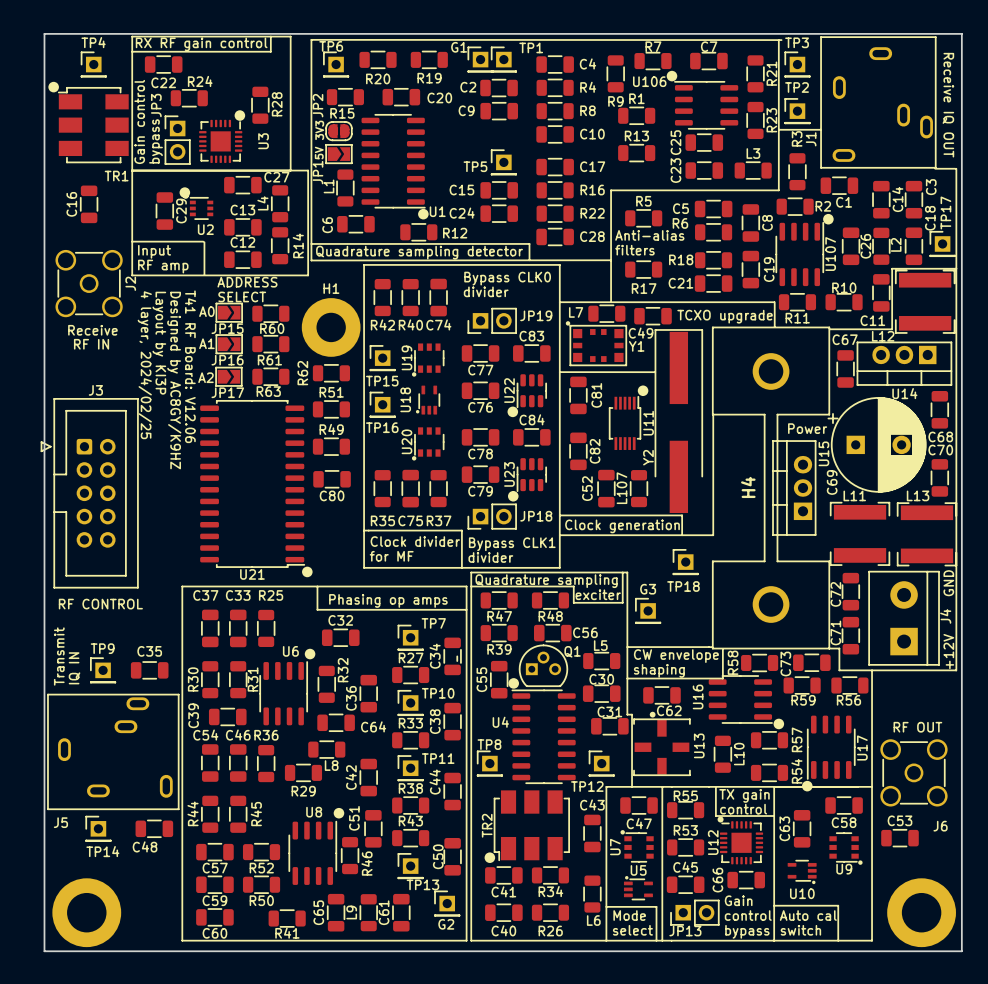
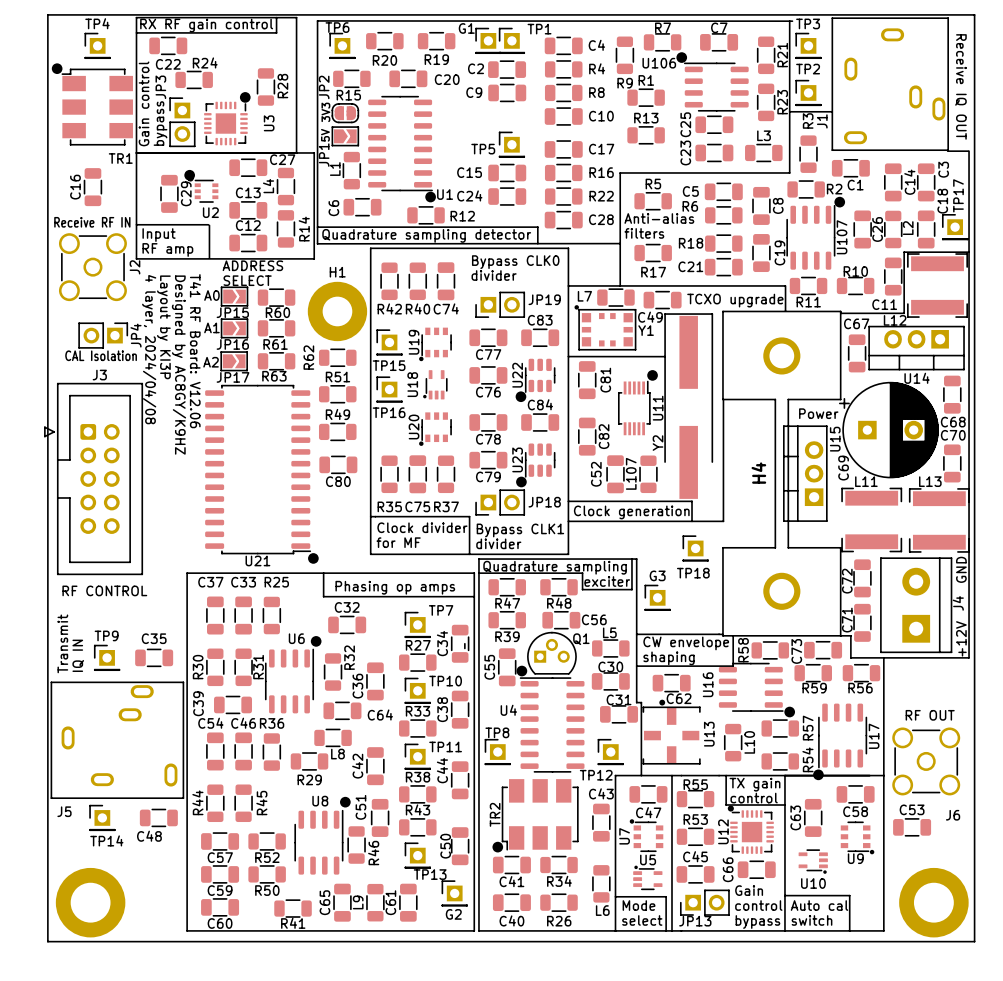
text: none -> Receive RF IN (92, 222)
text: Receive (92, 330) -> none
text: RF IN (91, 344) -> none
JP4: none -> (103, 335)
text: 4 layer, 2024/02/25 (144, 365) -> 4 layer, 2024/04/08 (149, 349)
text: none -> CAL Isolation (101, 355)

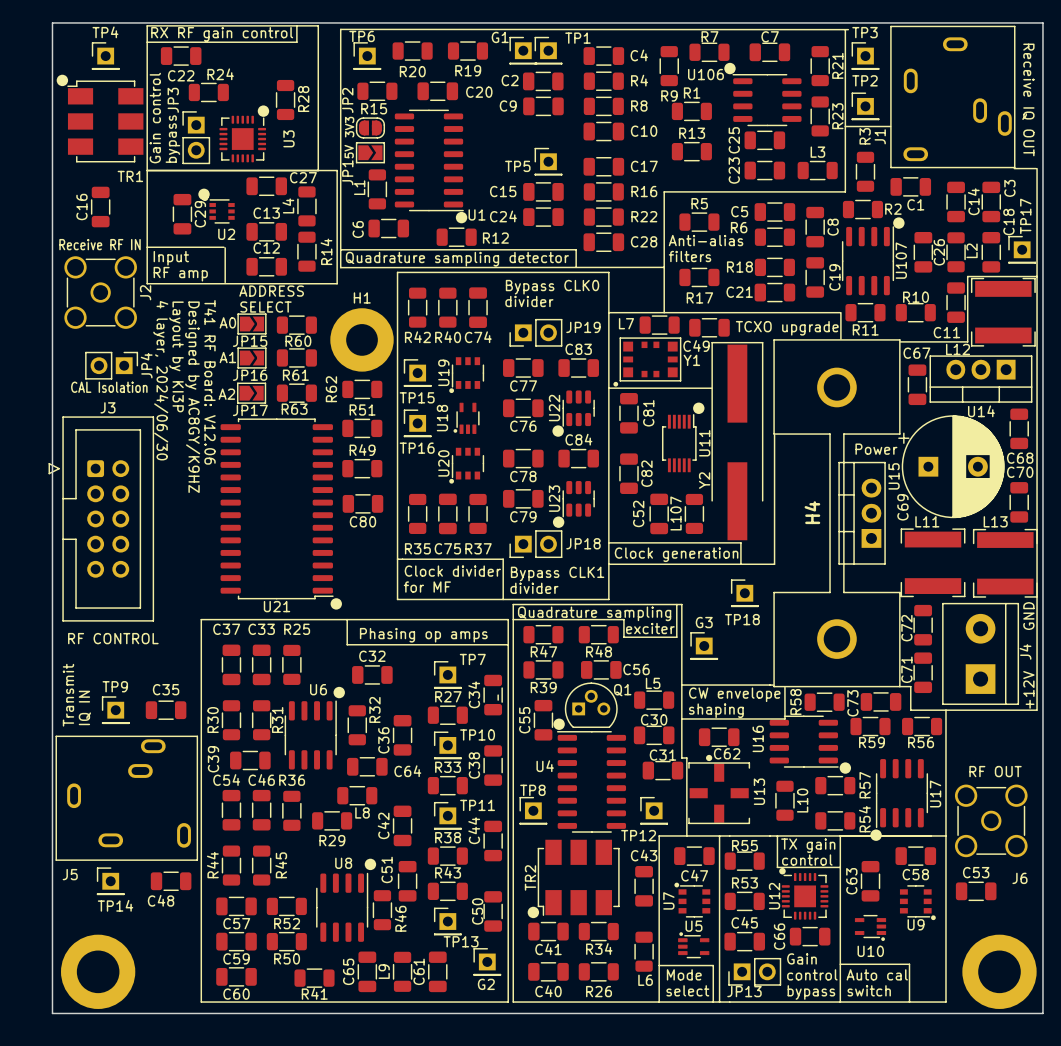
Y1 footprint: [574, 305, 637, 351] -> [613, 337, 682, 387]
text: 4 layer, 2024/04/08 (149, 349) -> 4 layer, 2024/06/30 (160, 380)

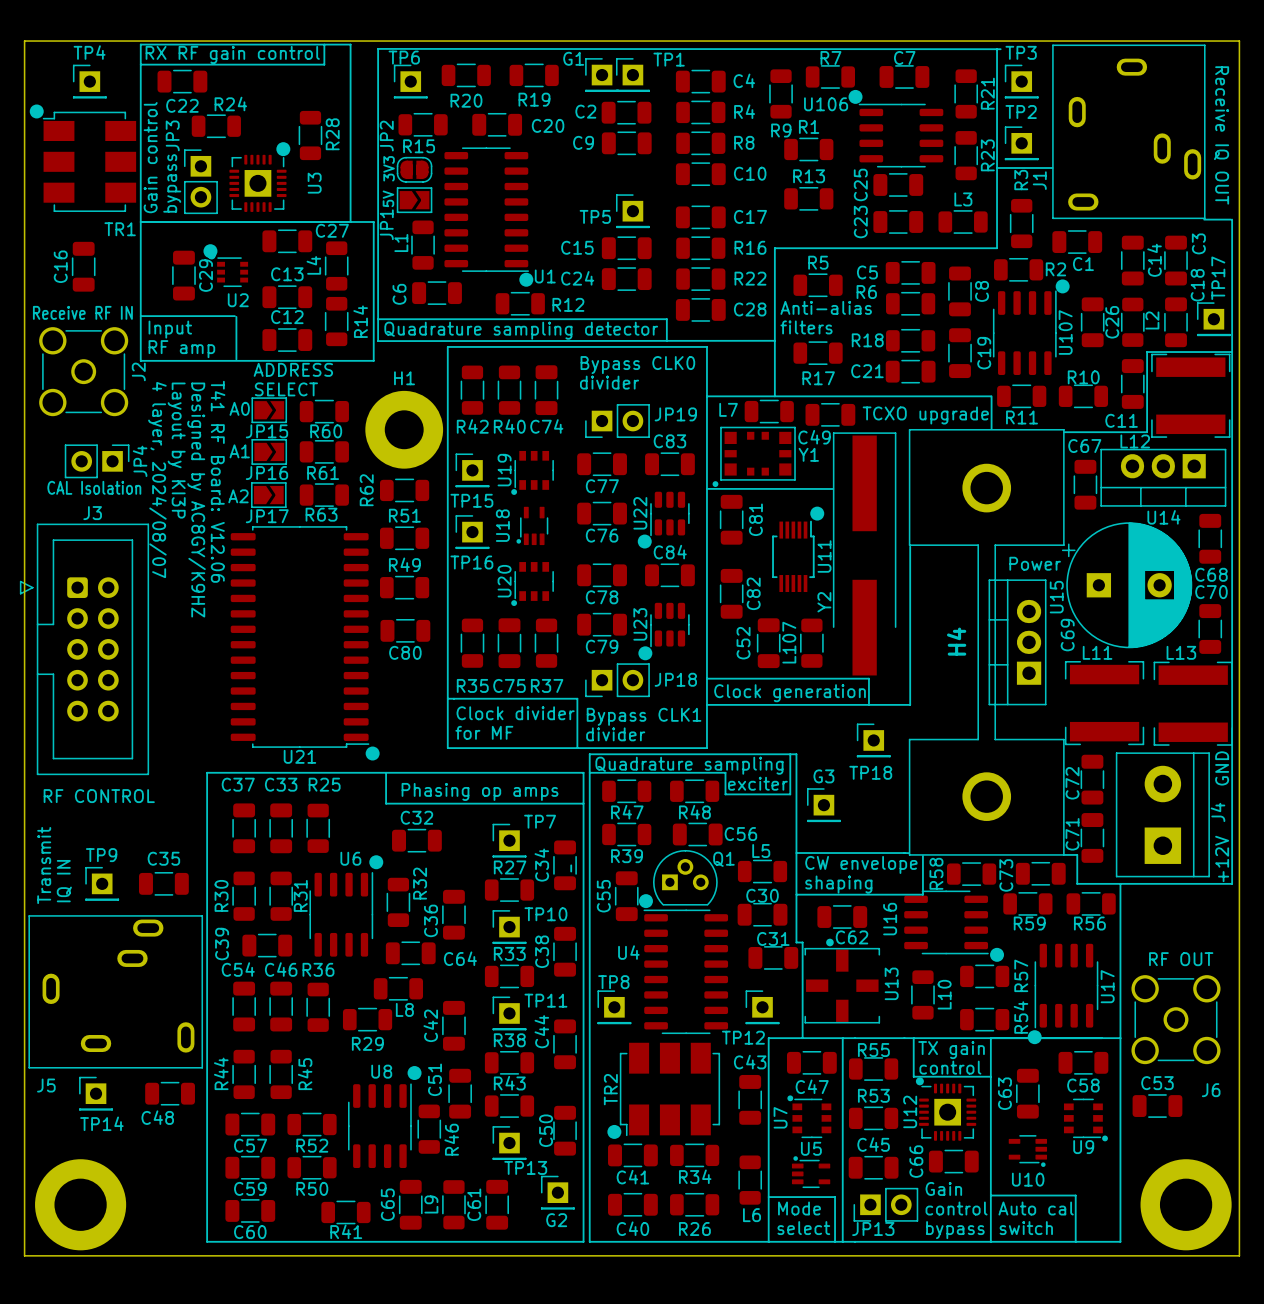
U3 footprint: [219, 115, 267, 163] -> [229, 154, 287, 212]
text: 4 layer, 2024/06/30 (160, 380) -> 4 layer, 2024/08/07 (157, 480)
U12 footprint: [781, 873, 829, 920] -> [919, 1083, 977, 1141]

